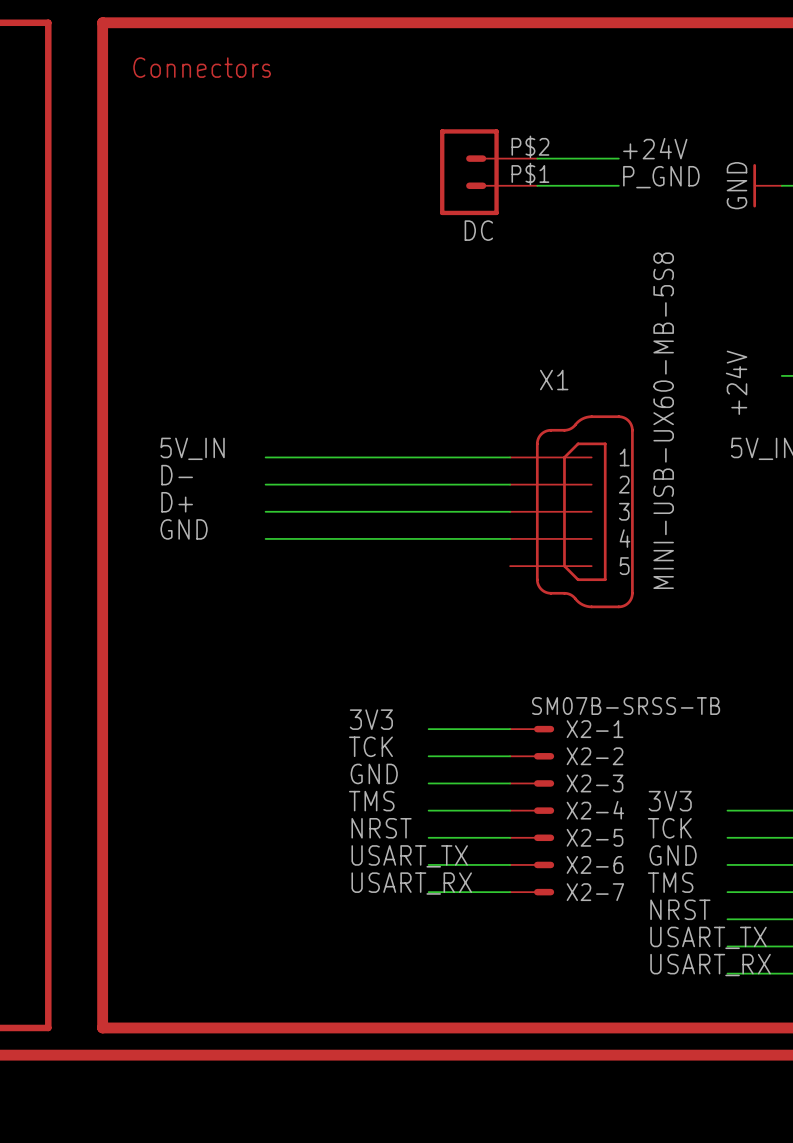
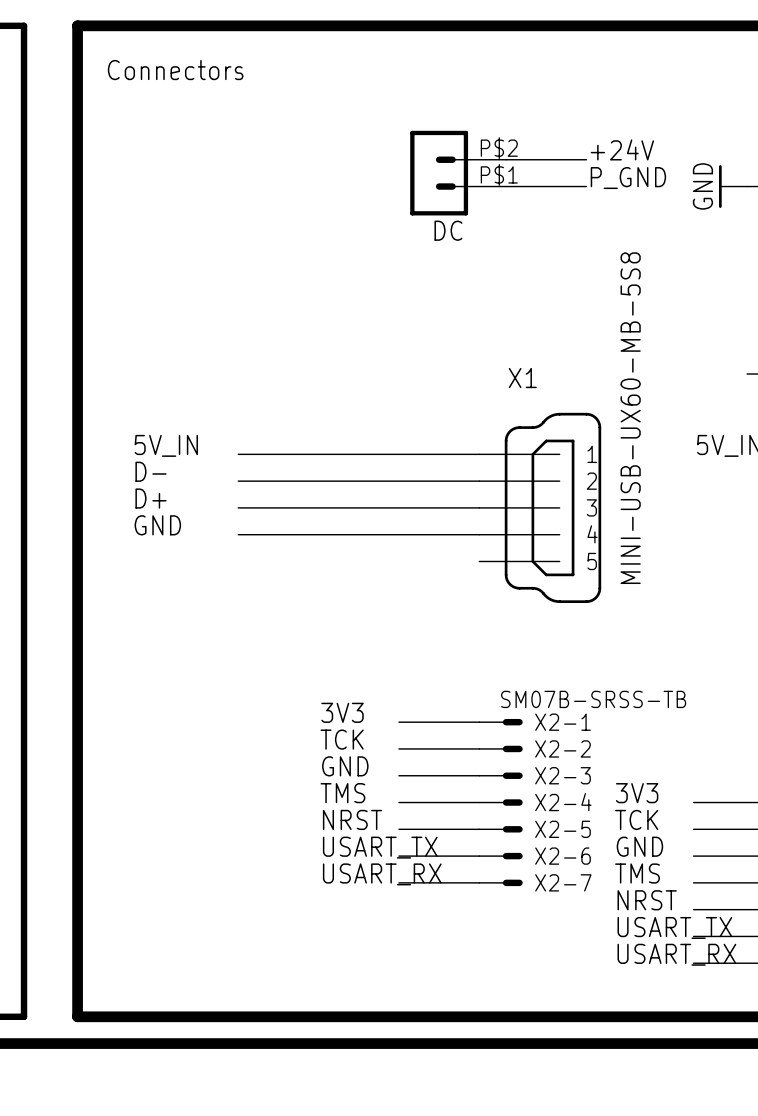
label: +24V (736, 382) -> none

